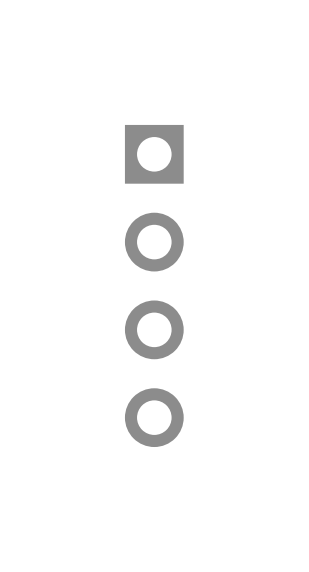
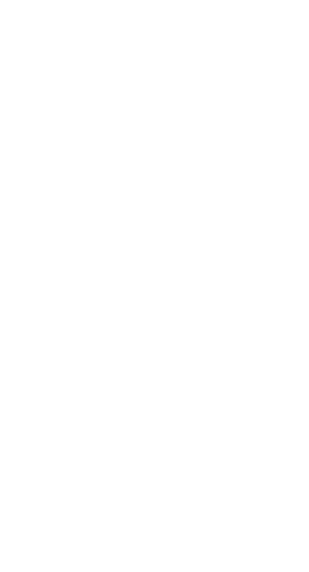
part: (154, 285) -> none

